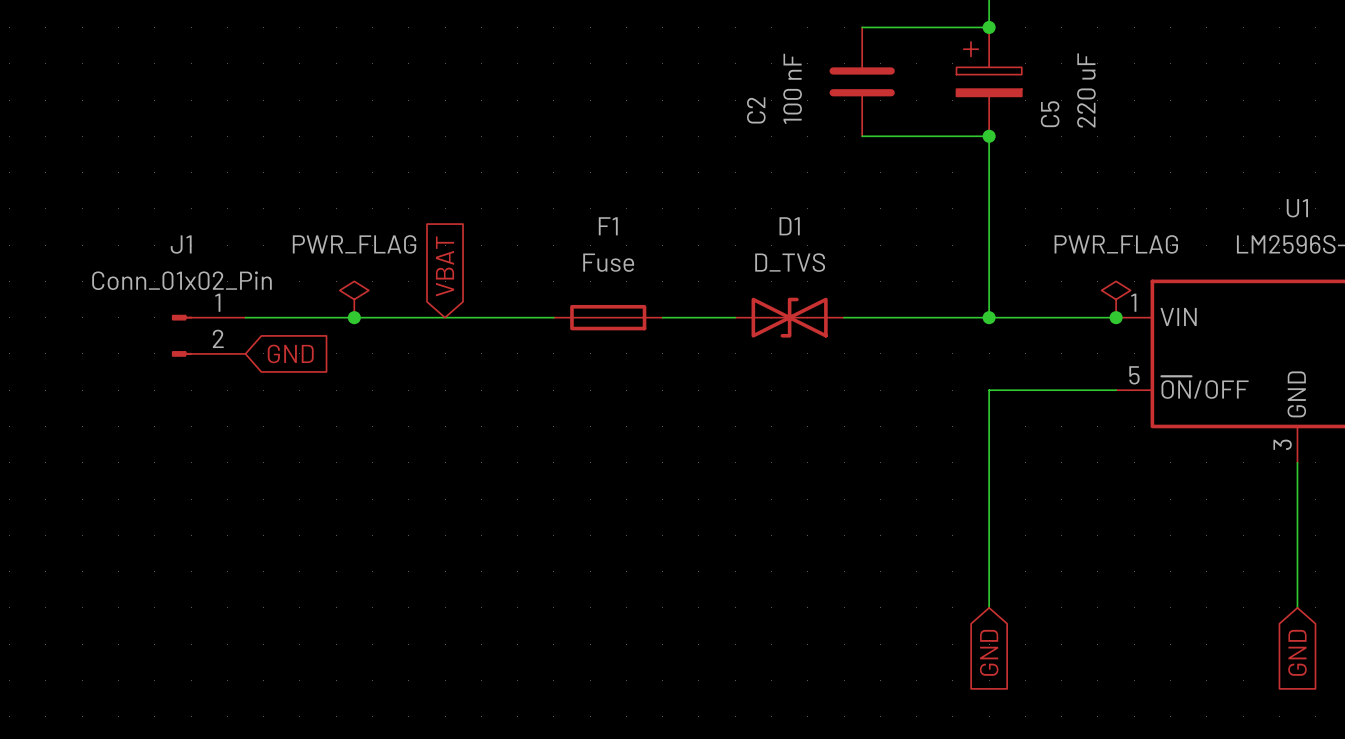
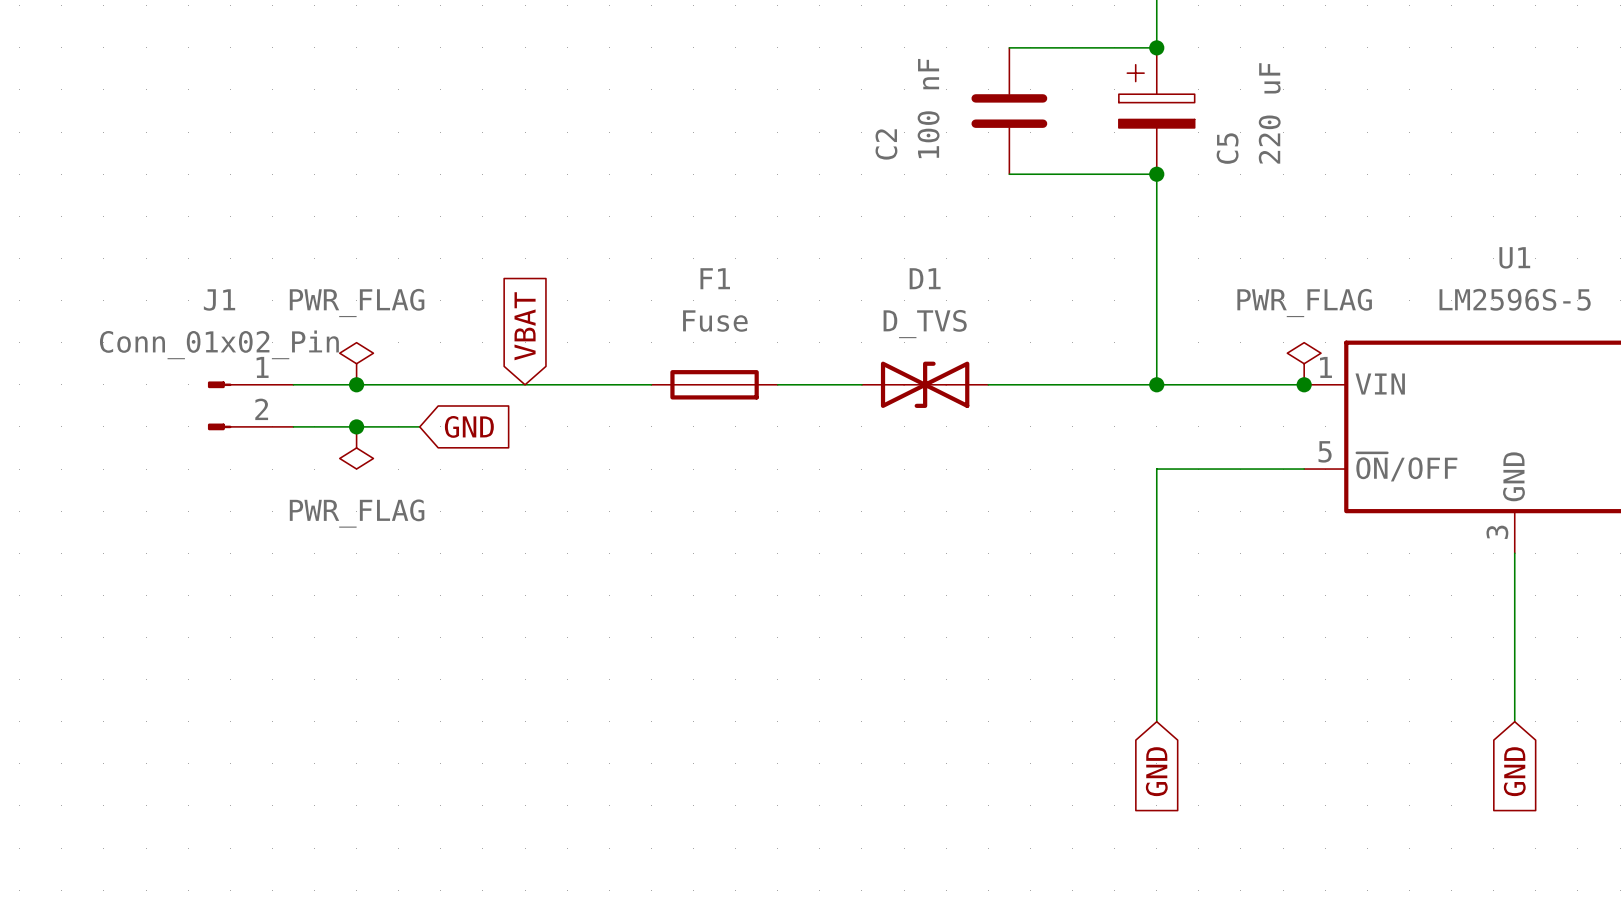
power symbol: none -> PWR_FLAG (356, 363)
power symbol: PWR_FLAG (354, 299) -> none
junction: none -> (356, 384)
junction: (354, 317) -> none
wire: none -> (293, 426) (419, 426)
global label position: GND (290, 353) -> GND (469, 426)
junction: none -> (356, 426)
power symbol: none -> PWR_FLAG (356, 447)

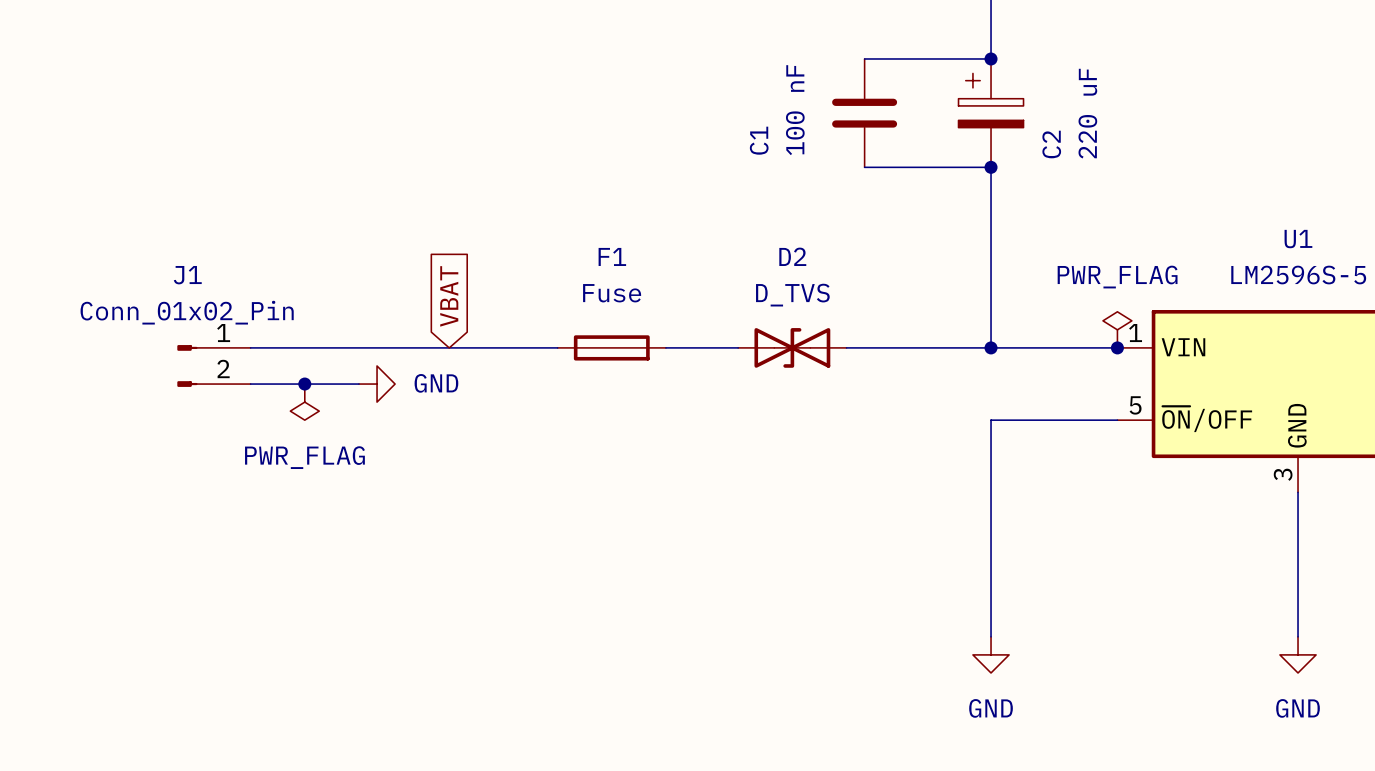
C2 name: C2 (886, 144) -> C1 (759, 140)
C5 name: C5 (1227, 148) -> C2 (1051, 144)
D1 name: D1 (925, 278) -> D2 (792, 256)
power symbol: PWR_FLAG (356, 363) -> none
junction: (356, 384) -> none
power symbol: none -> GND (377, 384)
global label: GND (469, 426) -> none
power symbol: none -> GND (991, 654)
power symbol: none -> GND (1298, 654)
global label: GND (1156, 771) -> none
global label: GND (1514, 771) -> none

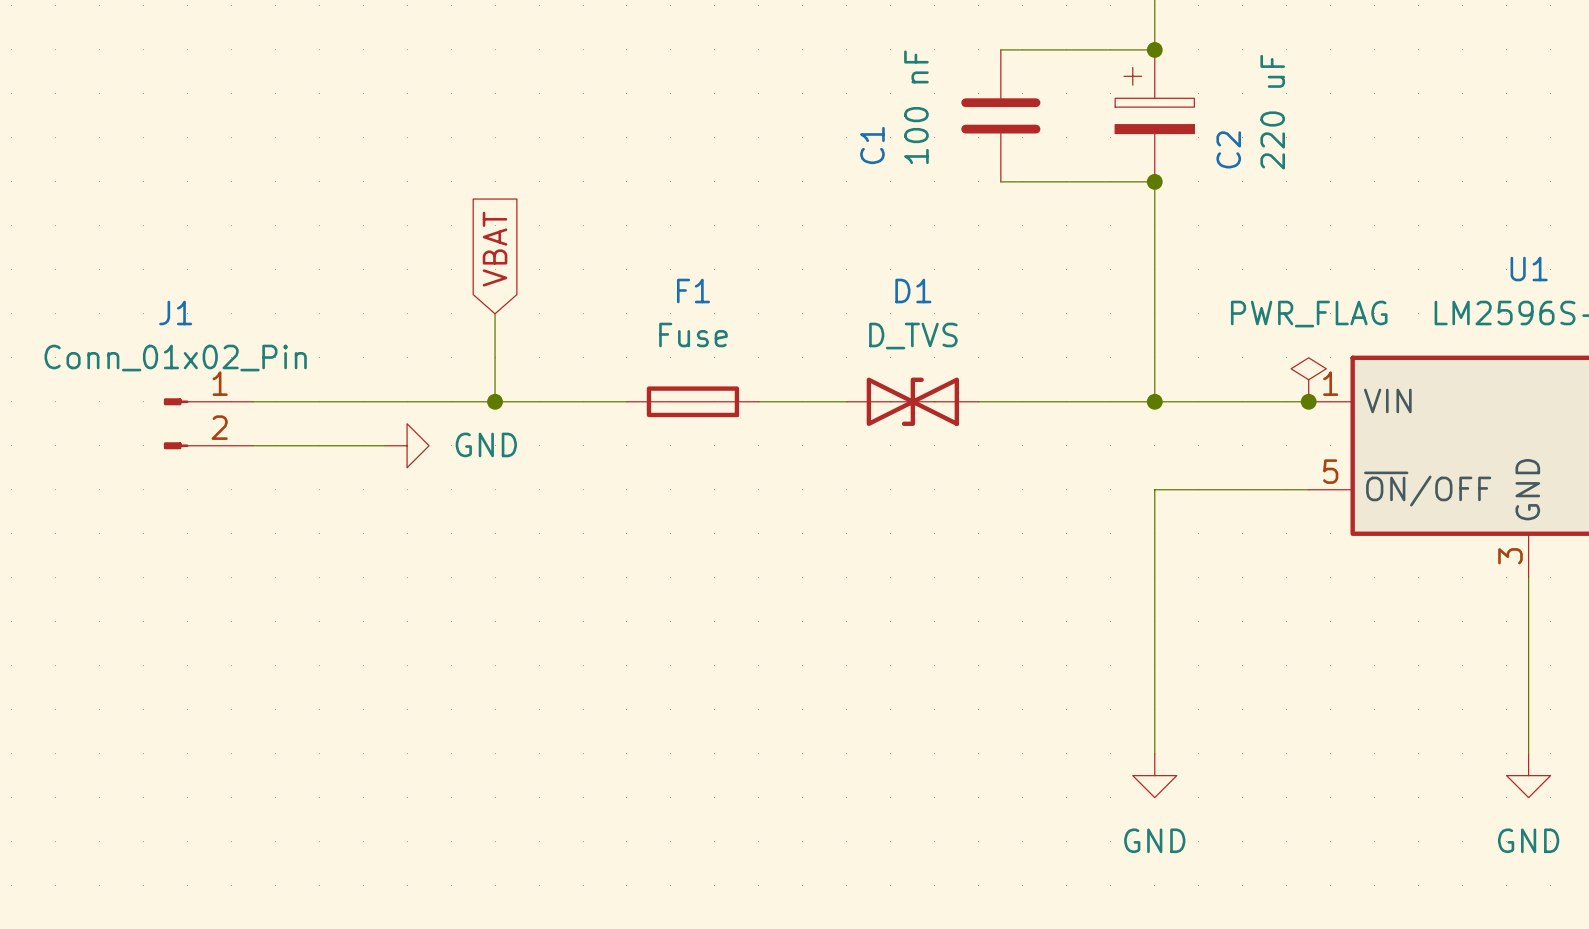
D2 name: D2 (792, 256) -> D1 (913, 291)
wire: none -> (495, 313) (495, 401)
global label position: VBAT (449, 296) -> VBAT (495, 249)
junction: none -> (495, 401)
junction: (304, 384) -> none
power symbol: PWR_FLAG (304, 402) -> none

